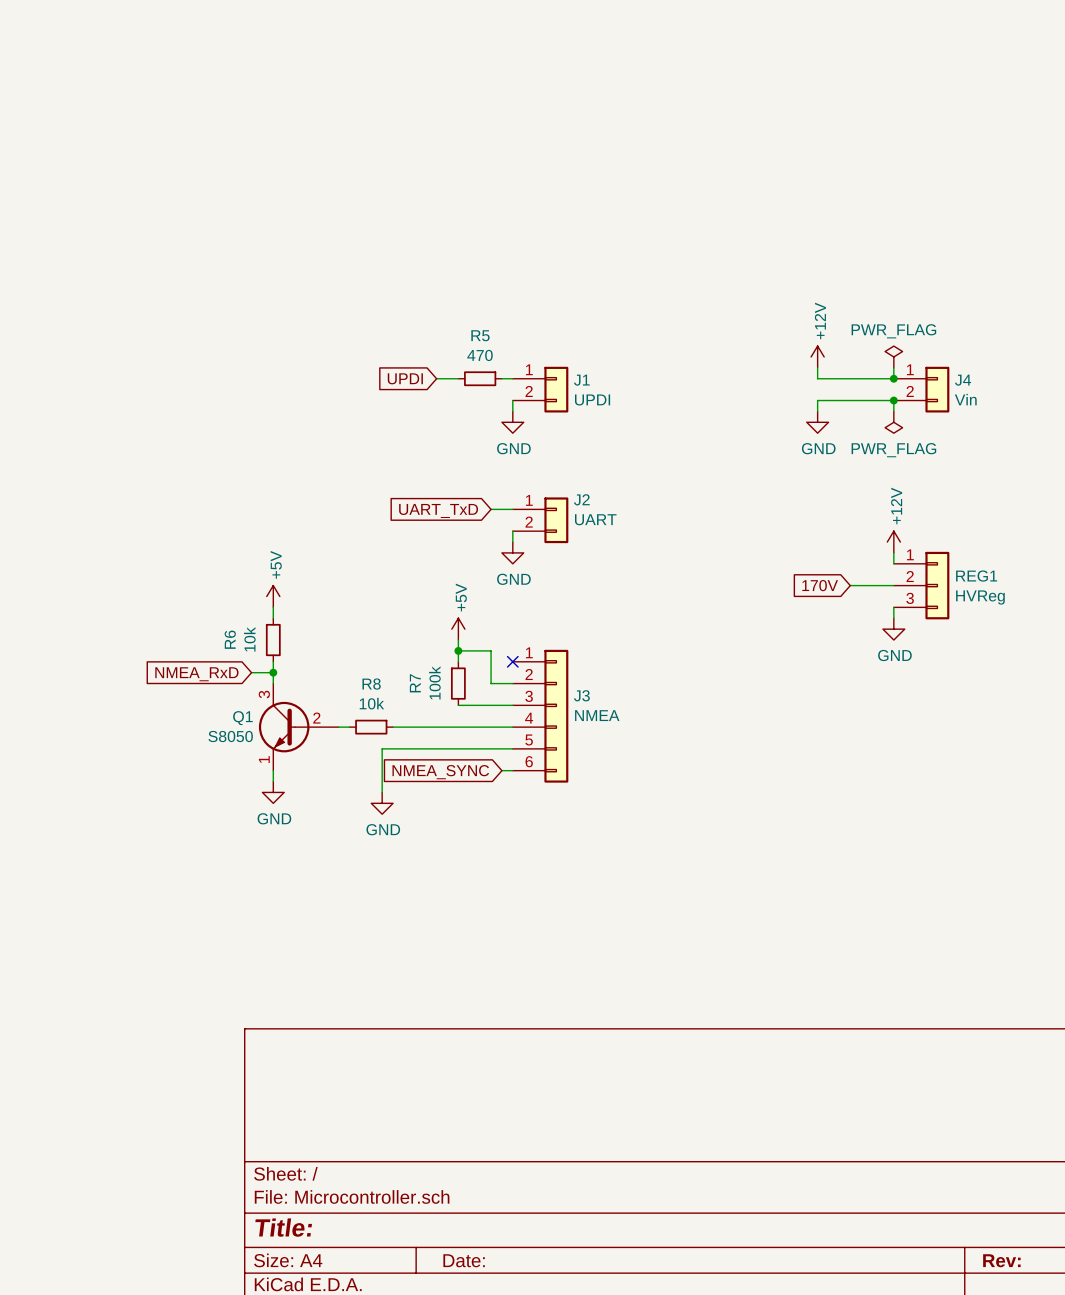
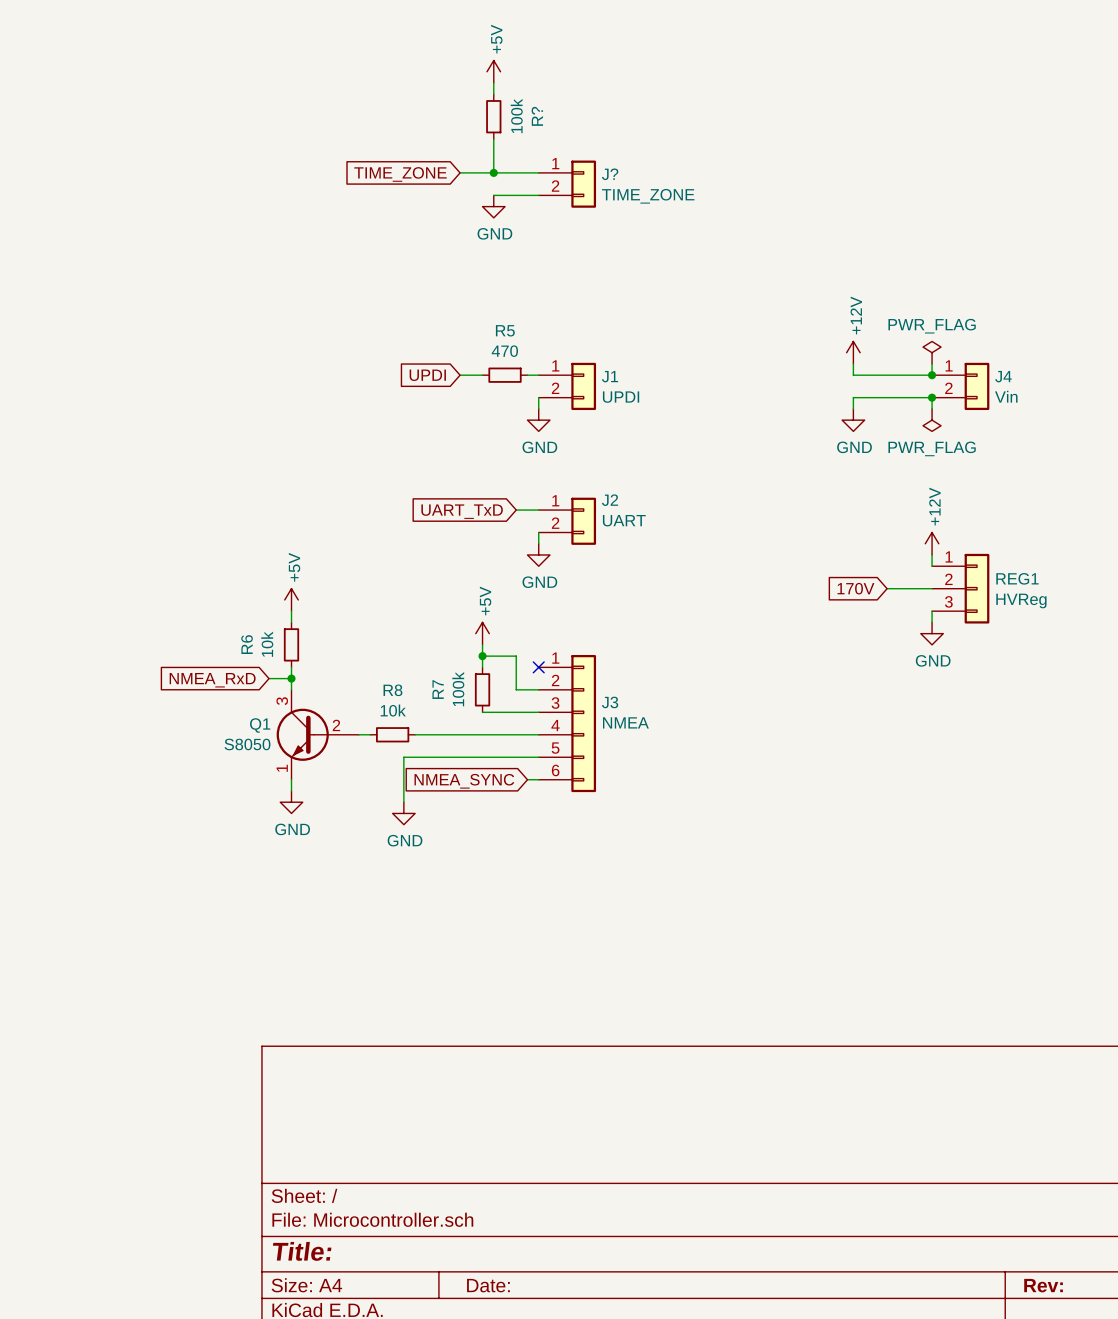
power symbol: none -> +5V (493, 71)
wire: none -> (493, 83) (493, 94)
R?: none -> 100k (493, 116)
wire: none -> (493, 139) (493, 172)
wire: none -> (460, 172) (538, 172)
junction: none -> (493, 172)
global label: none -> TIME_ZONE (400, 174)
J?: none -> TIME_ZONE (567, 184)
wire: none -> (493, 195) (538, 195)
power symbol: none -> GND (493, 206)

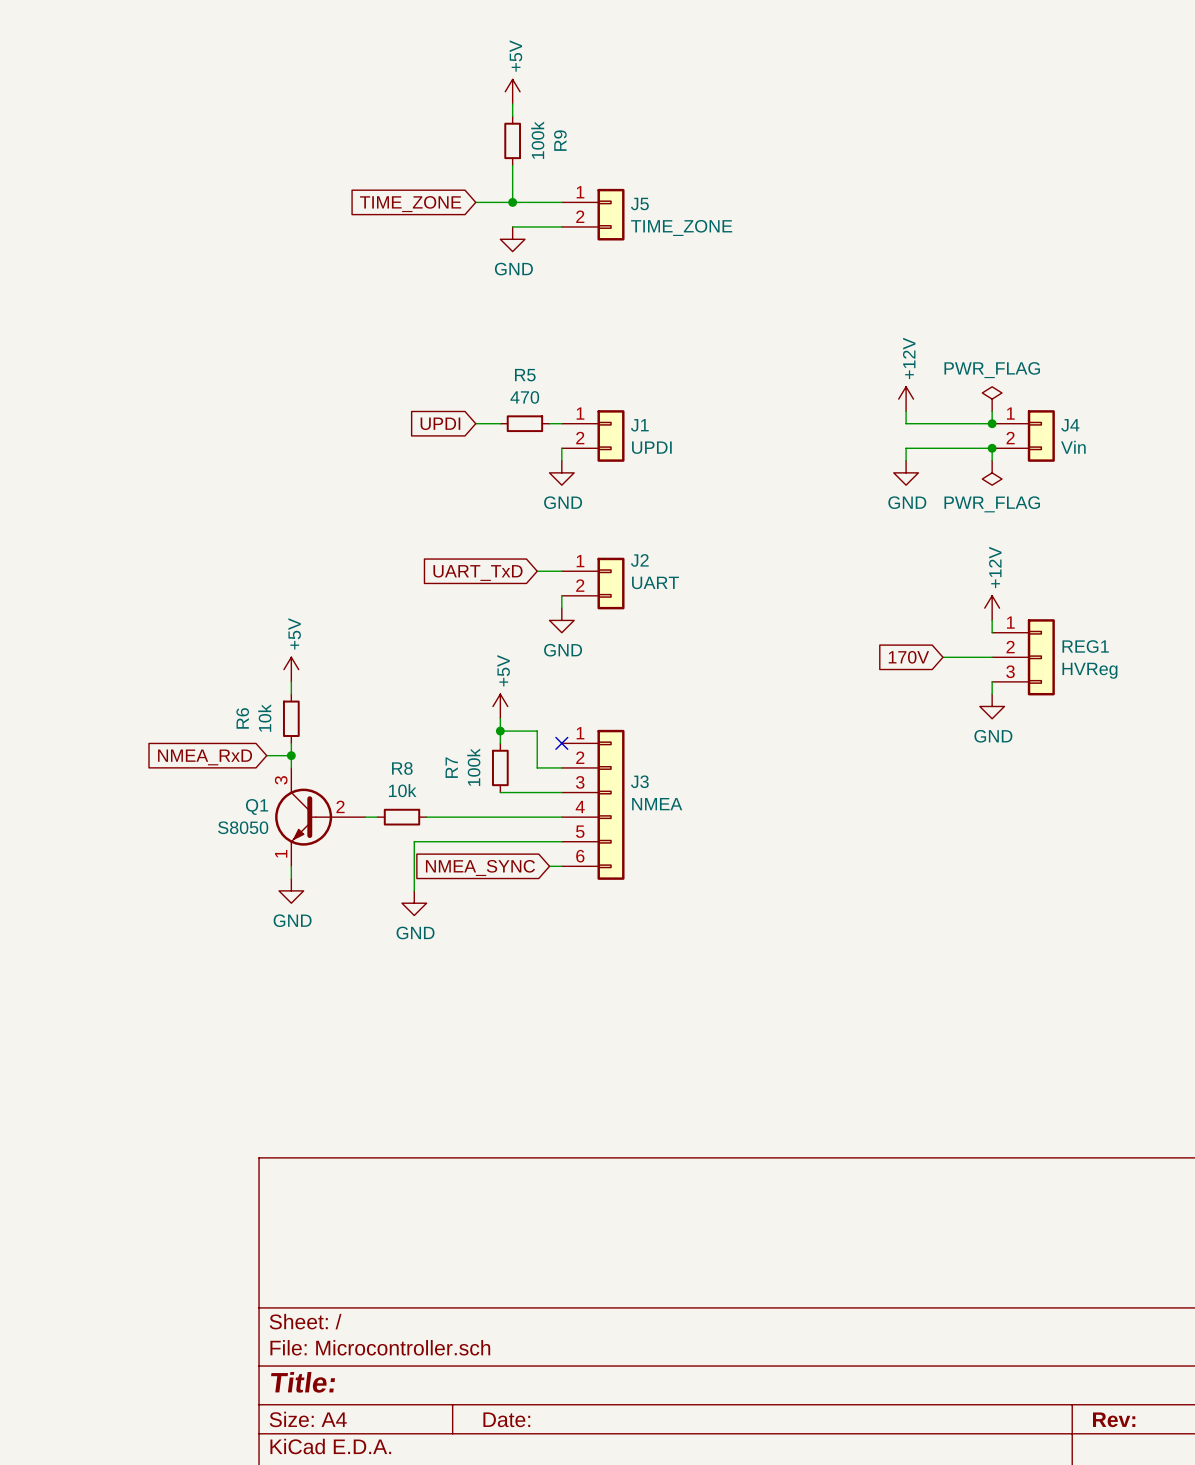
R? name: R? (537, 116) -> R9 (560, 140)
J? name: J? (610, 174) -> J5 (639, 203)

